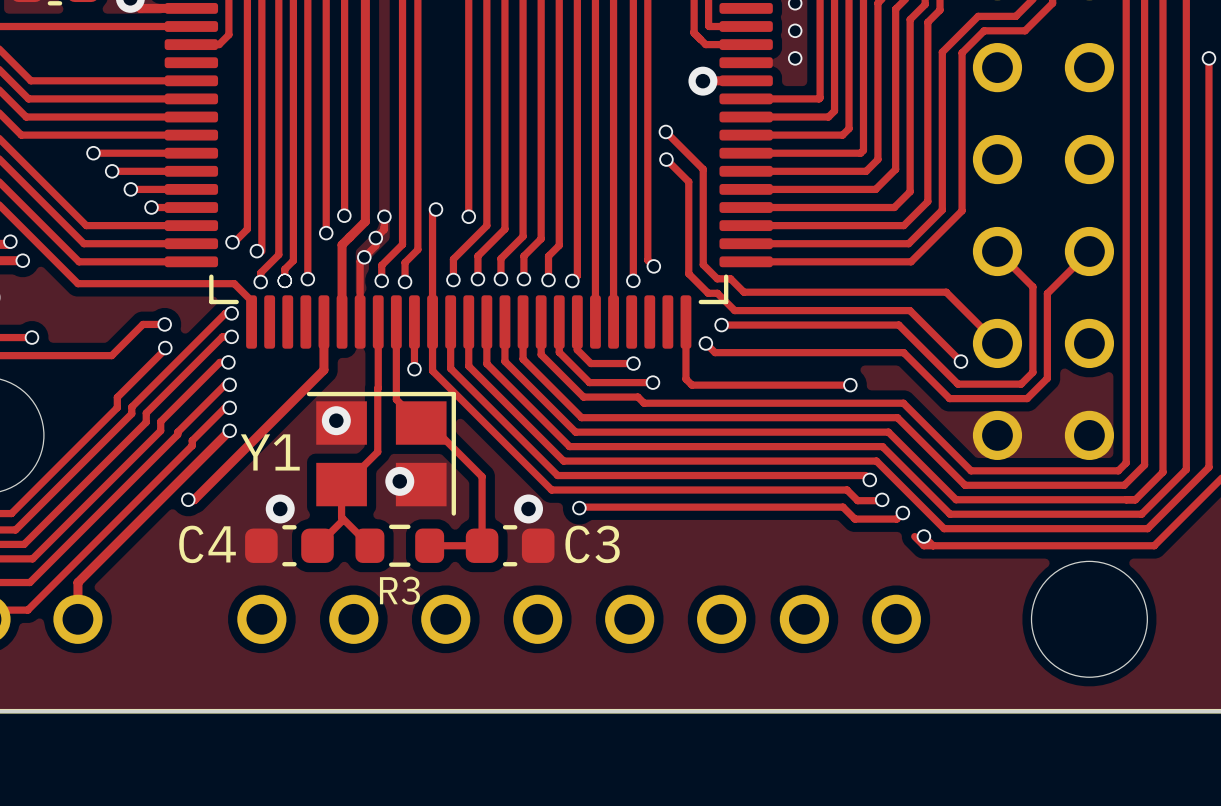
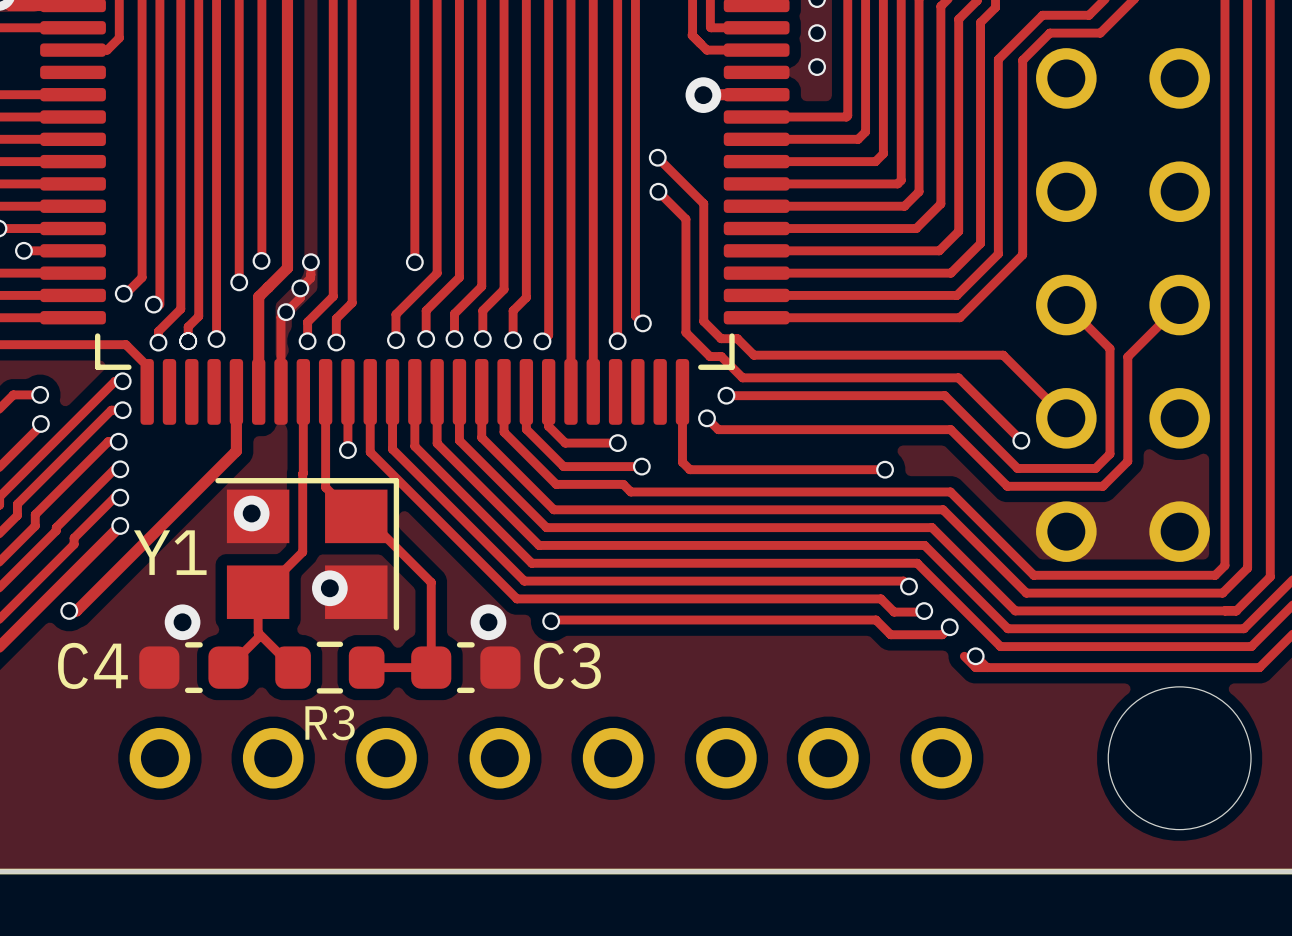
track: (435, 209) (432, 212) (432, 322) -> none
via: (435, 209) -> none

